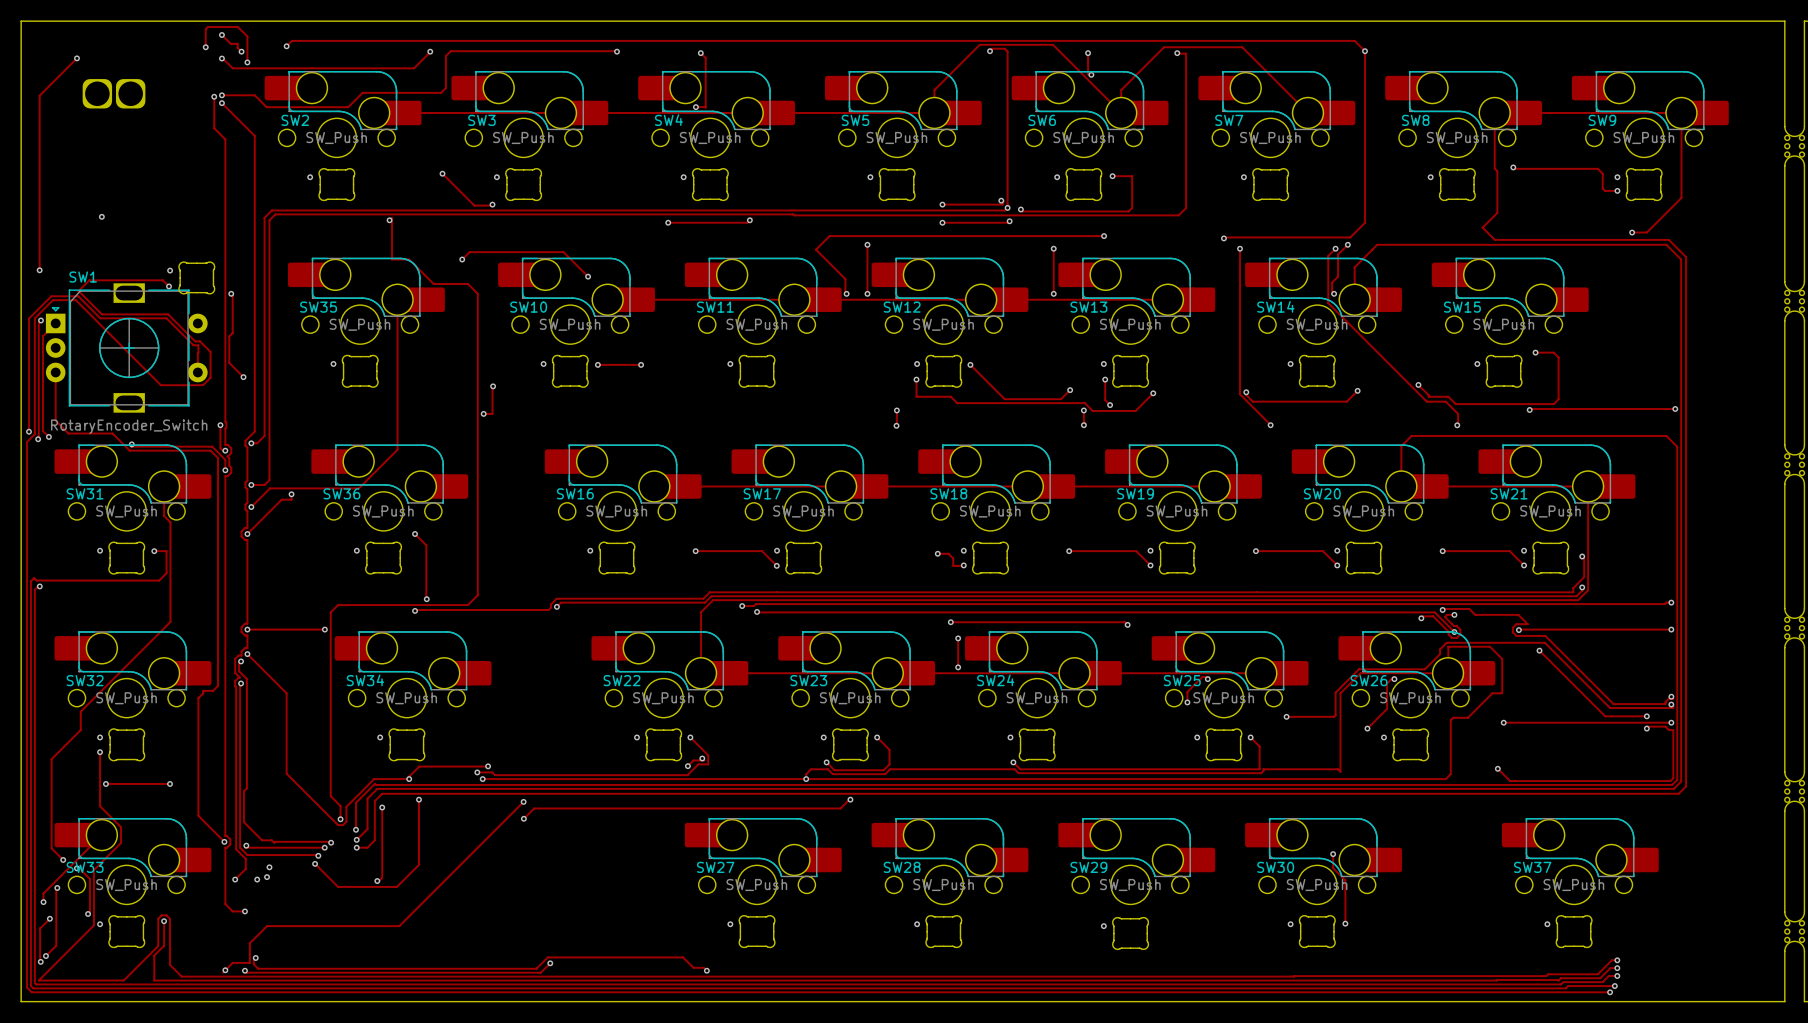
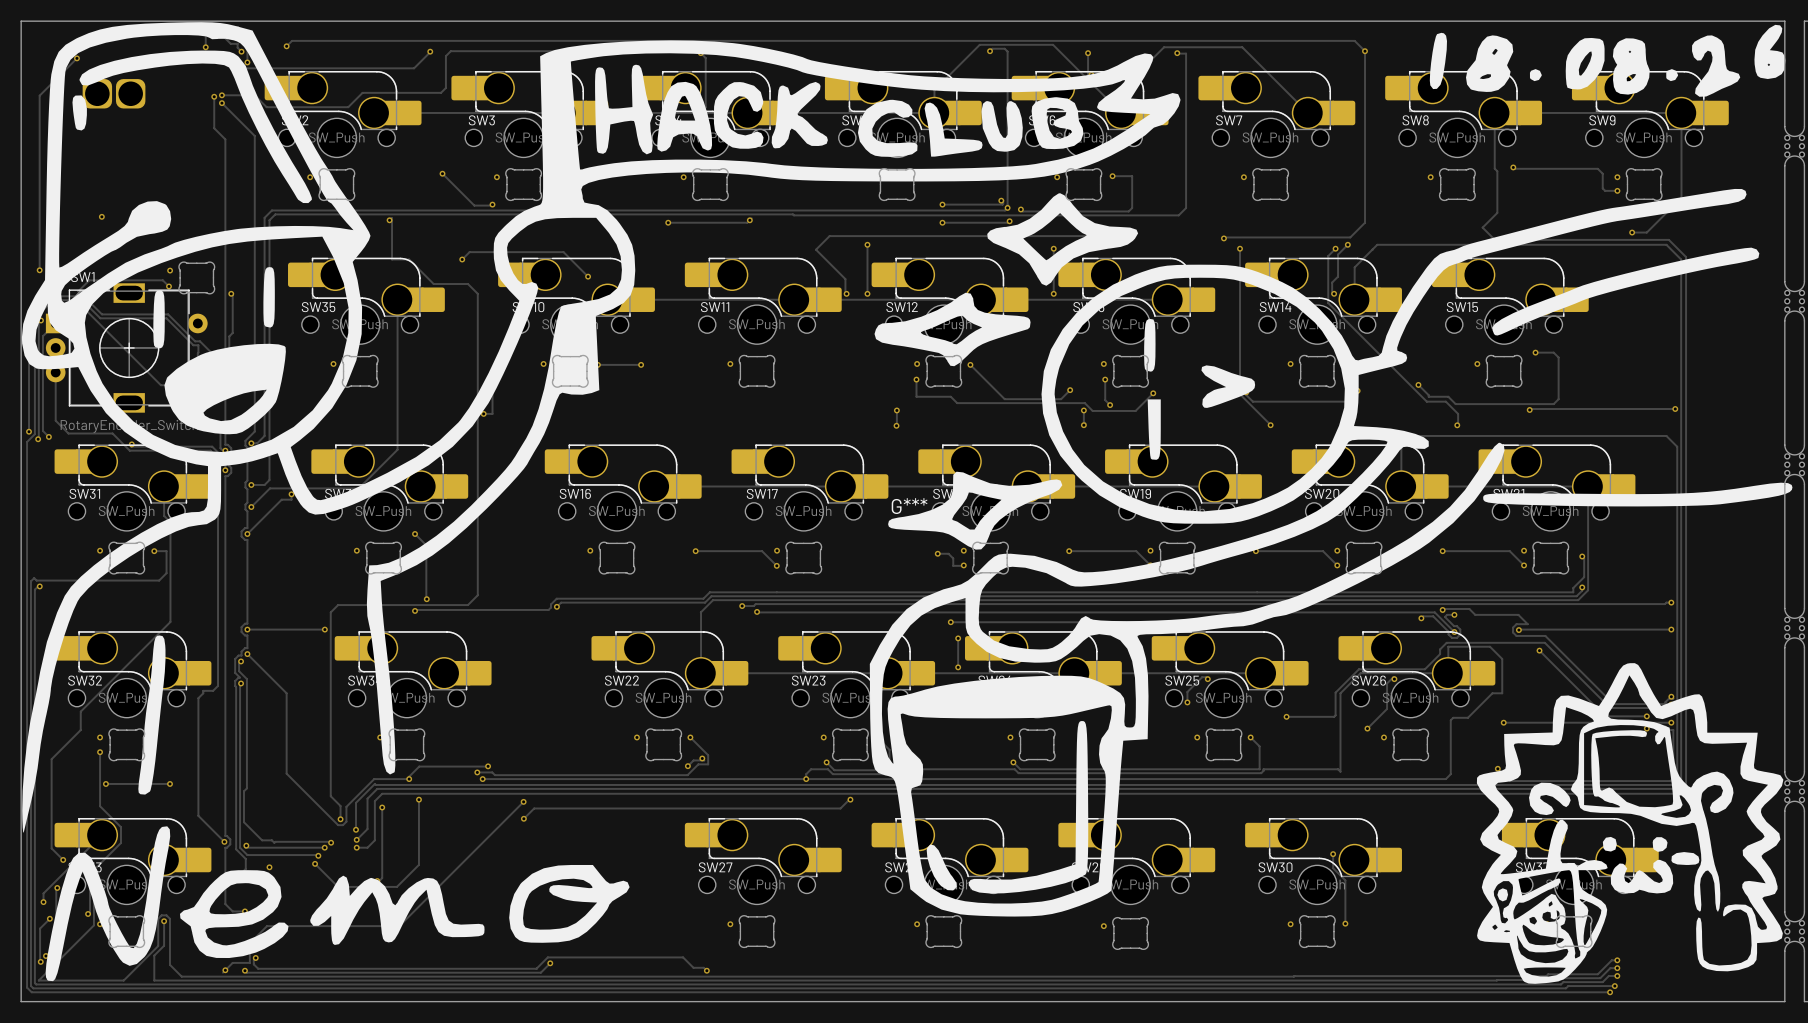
G***: none -> (907, 502)

